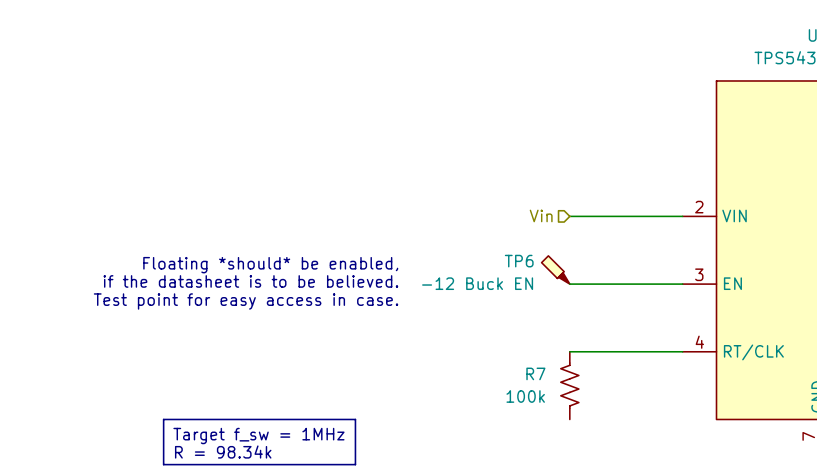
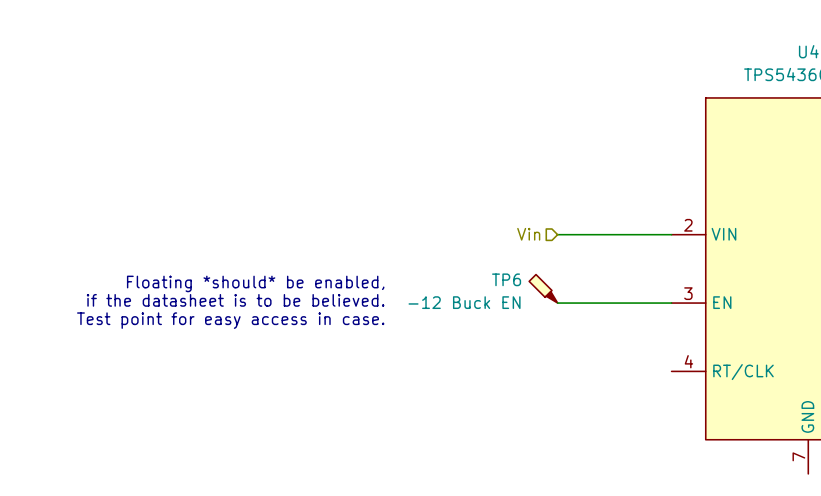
wire: (569, 351) (682, 351) -> none
R7: 100k (569, 385) -> none
line: (163, 419) (355, 419) (355, 464) (163, 464) (163, 419) -> none
text: Target f_sw = 1MHz (258, 436) -> none
text: R = 98.34k (223, 452) -> none

